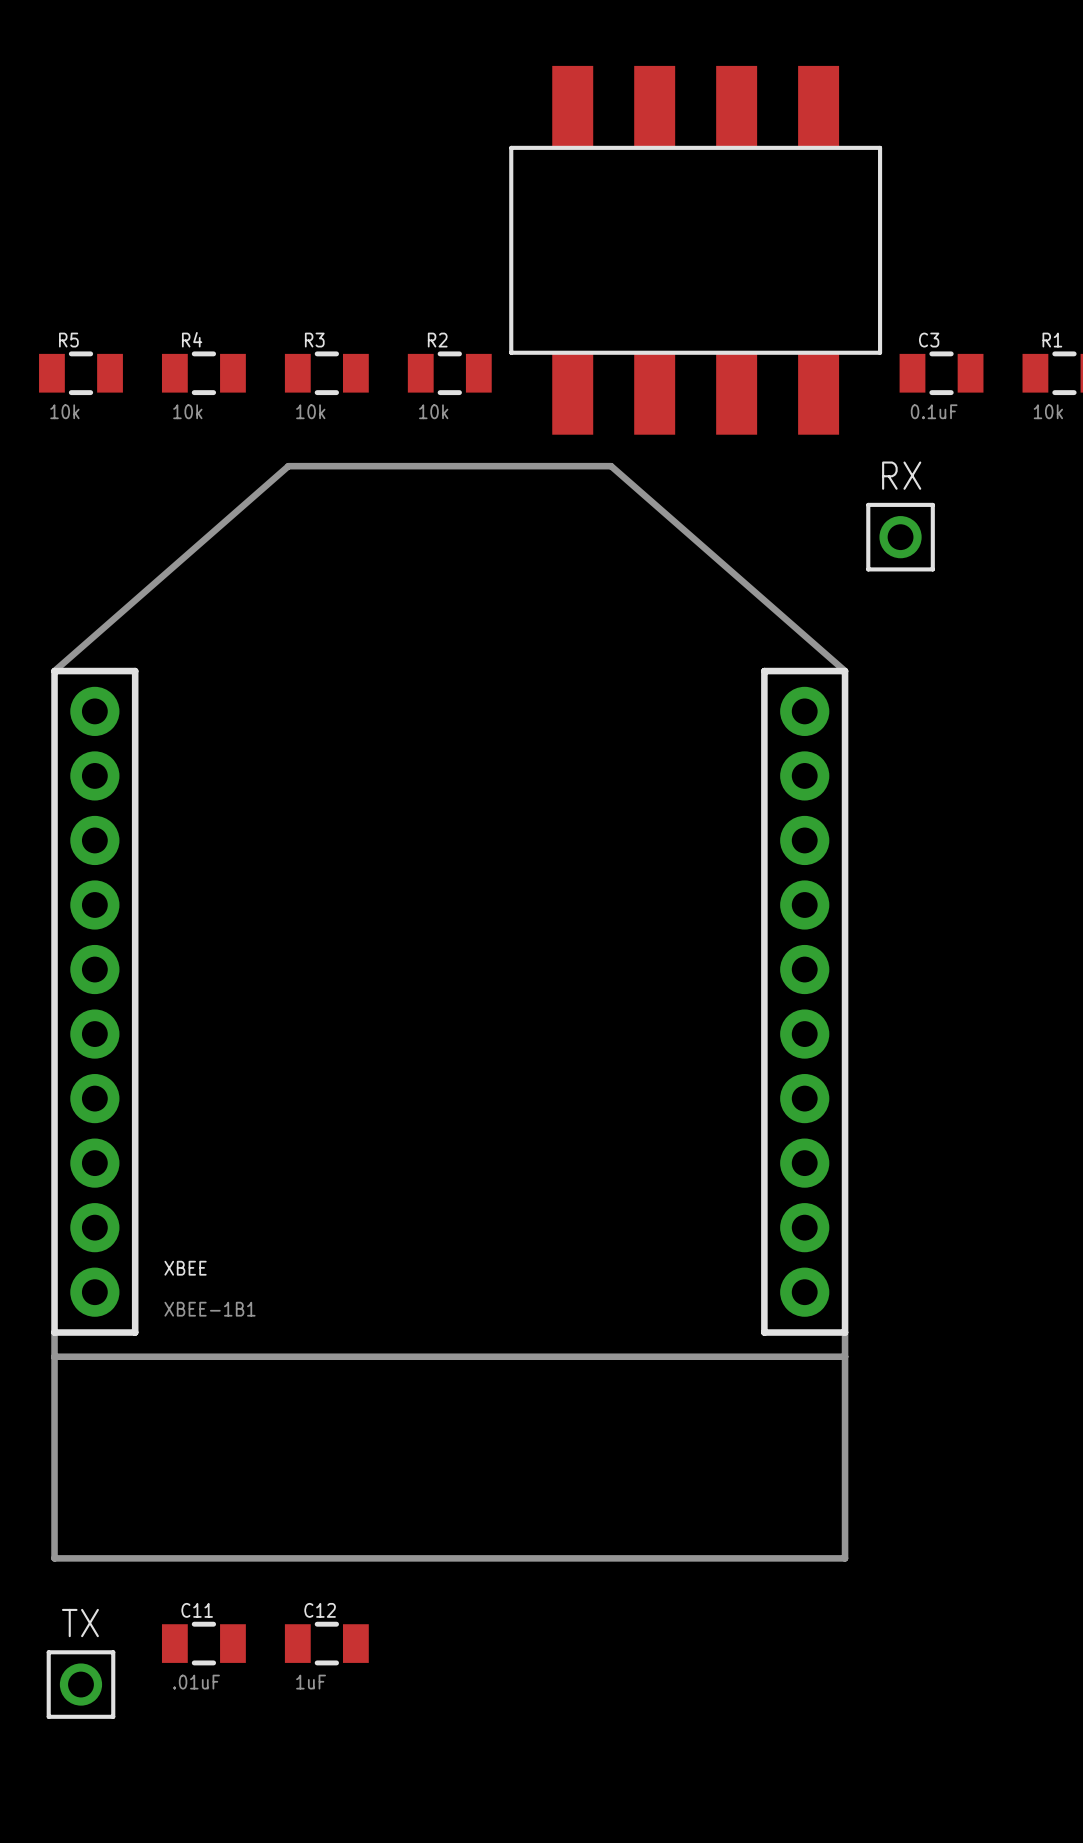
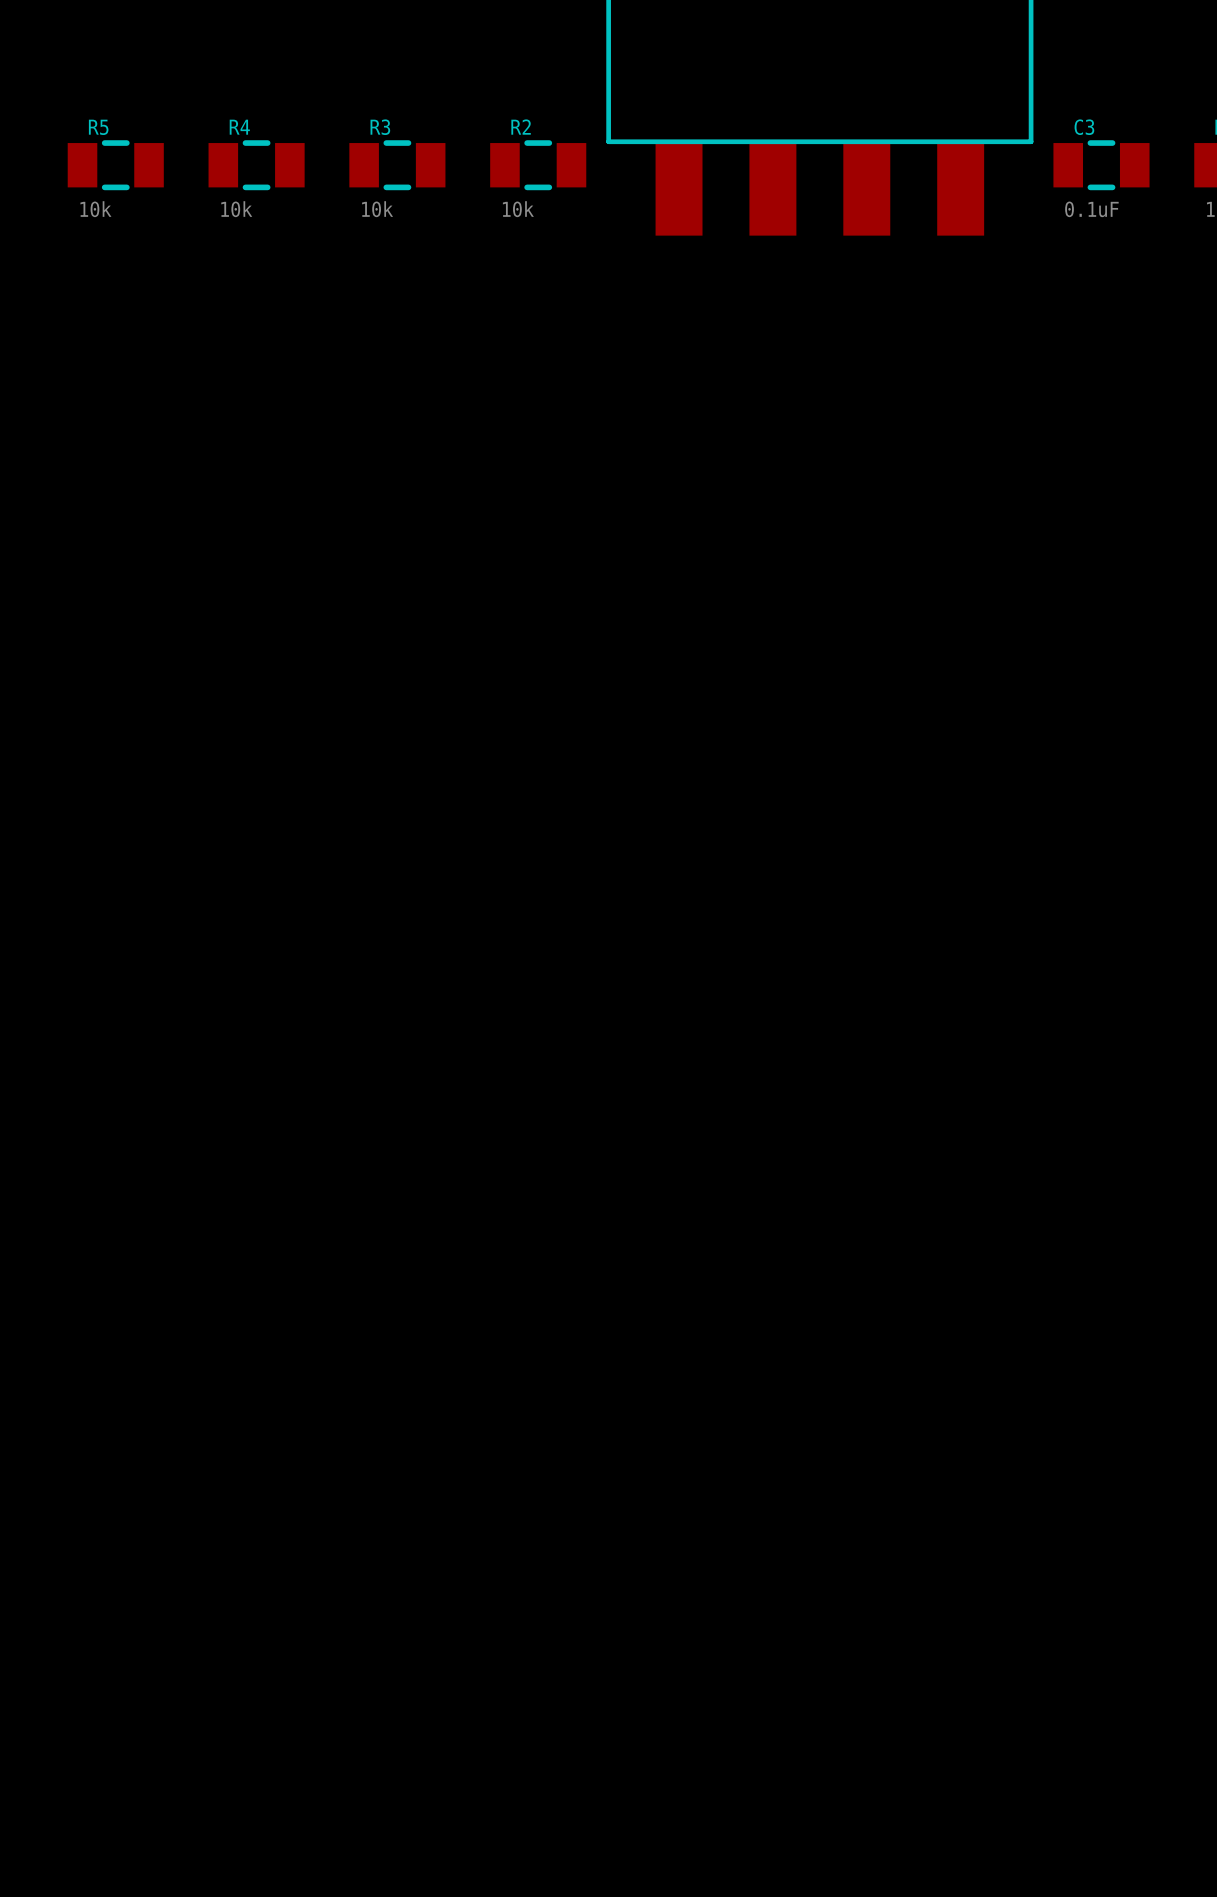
RX: (900, 537) -> none
XBEE: XBEE-1B1 (449, 1012) -> none
C11: .01uF (203, 1643) -> none
C12: 1uF (326, 1643) -> none
TX: (80, 1684) -> none

